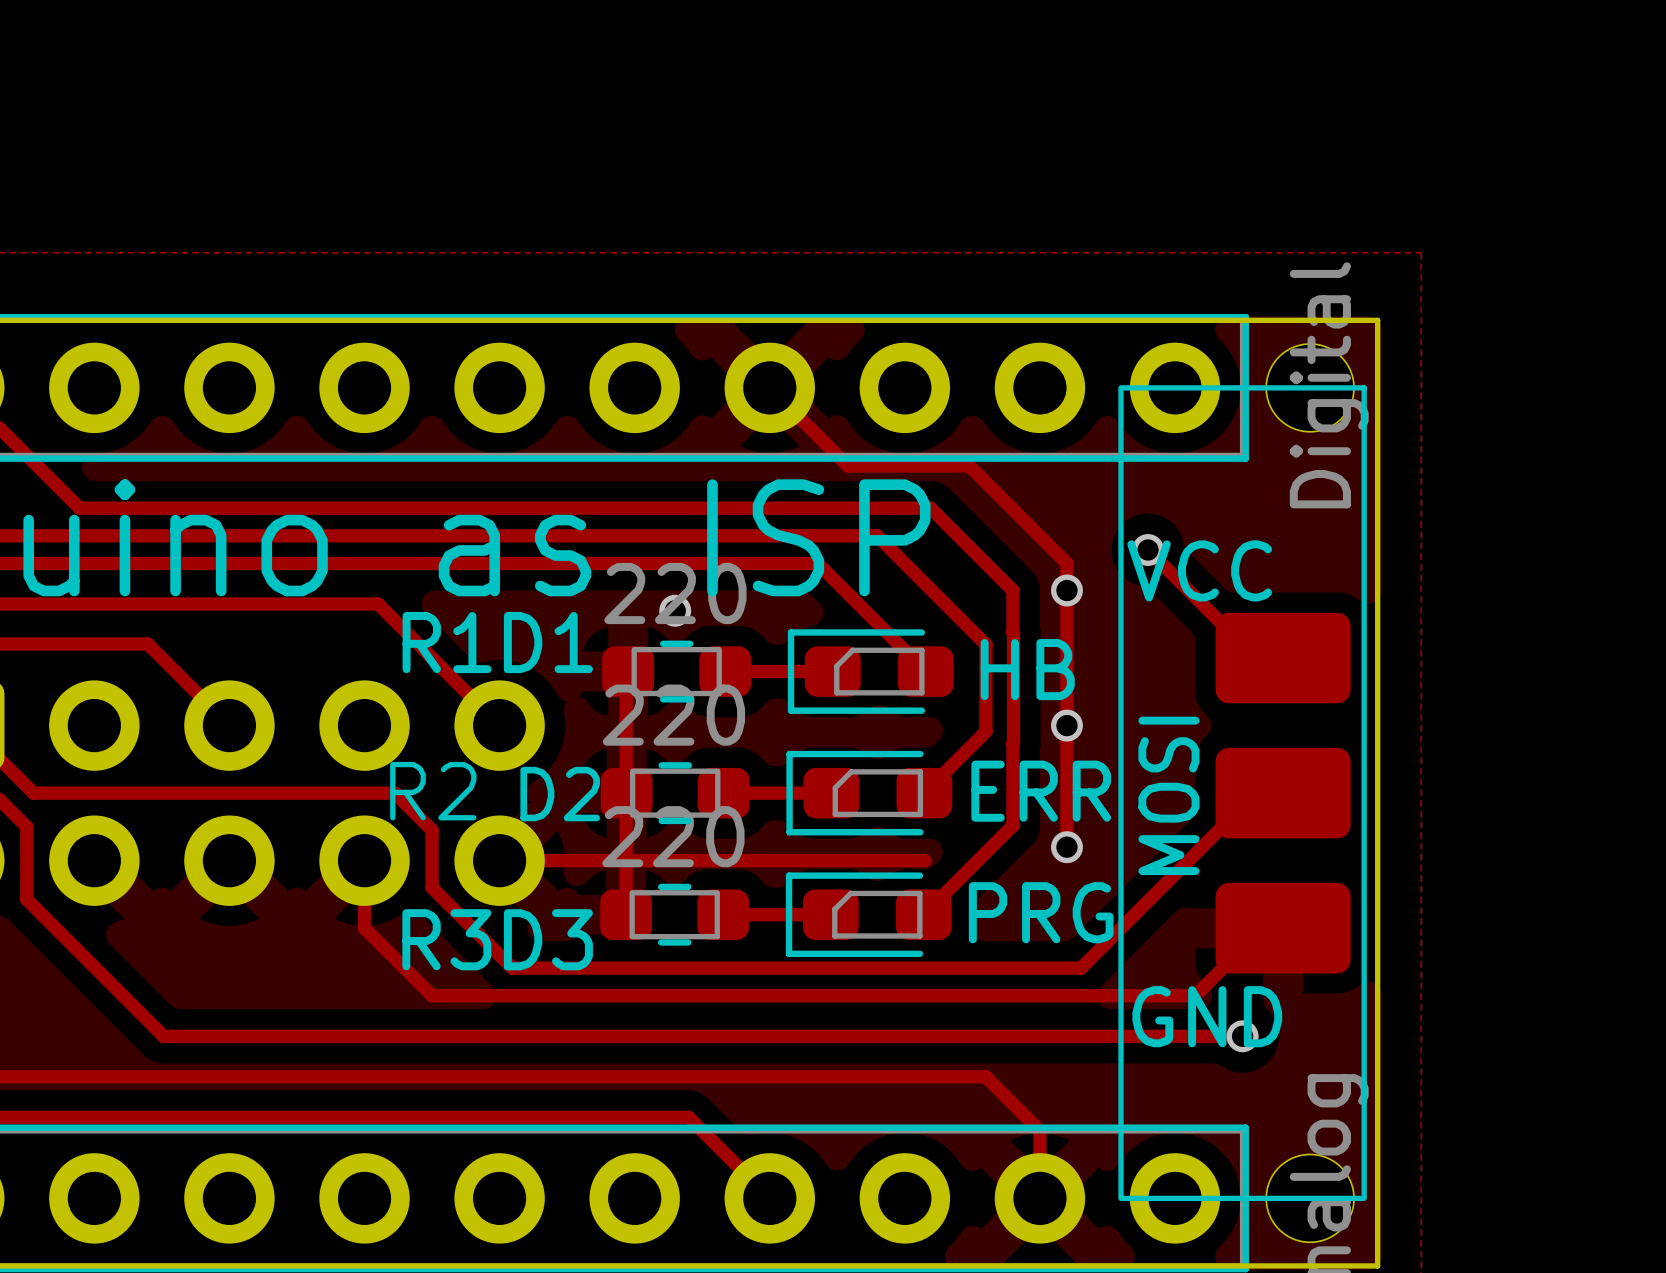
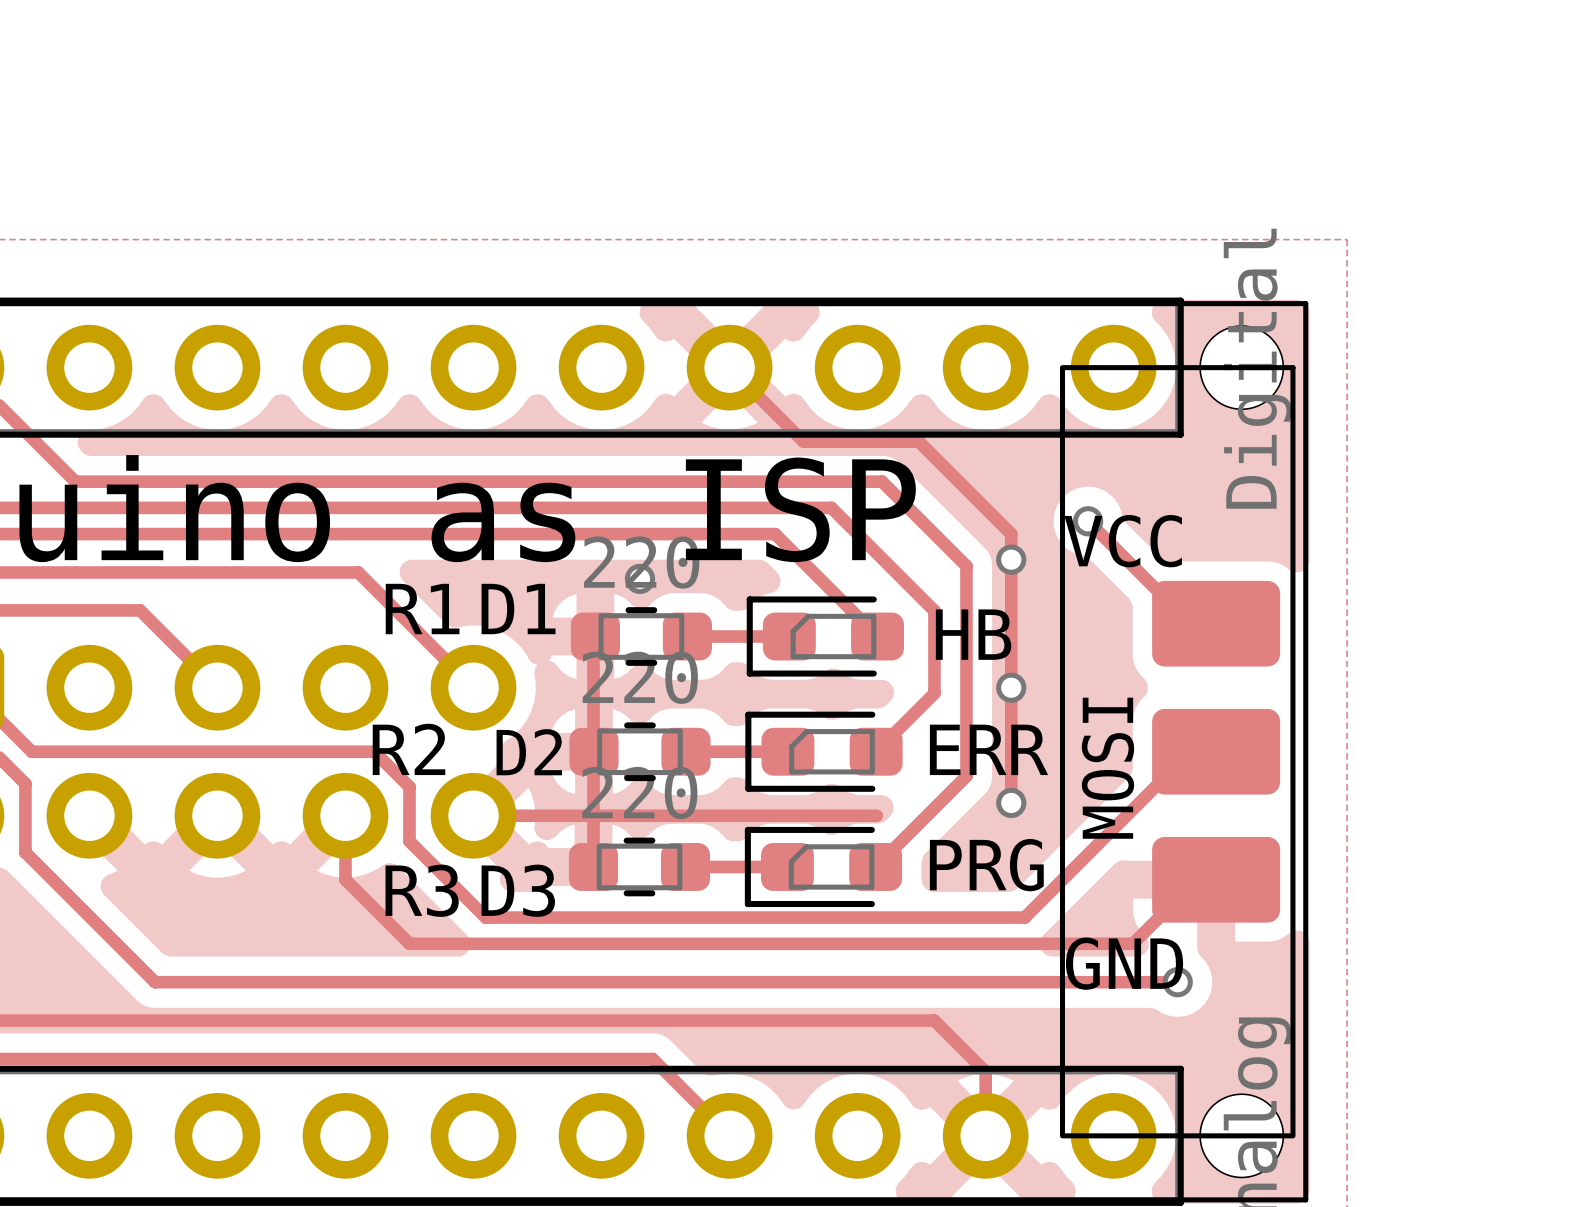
track: (1012, 590) (1012, 632) -> none
track: (1013, 633) (1013, 743) -> none
track: (1012, 743) (1012, 825) -> (960, 559) (966, 566) (966, 776) (960, 782)

